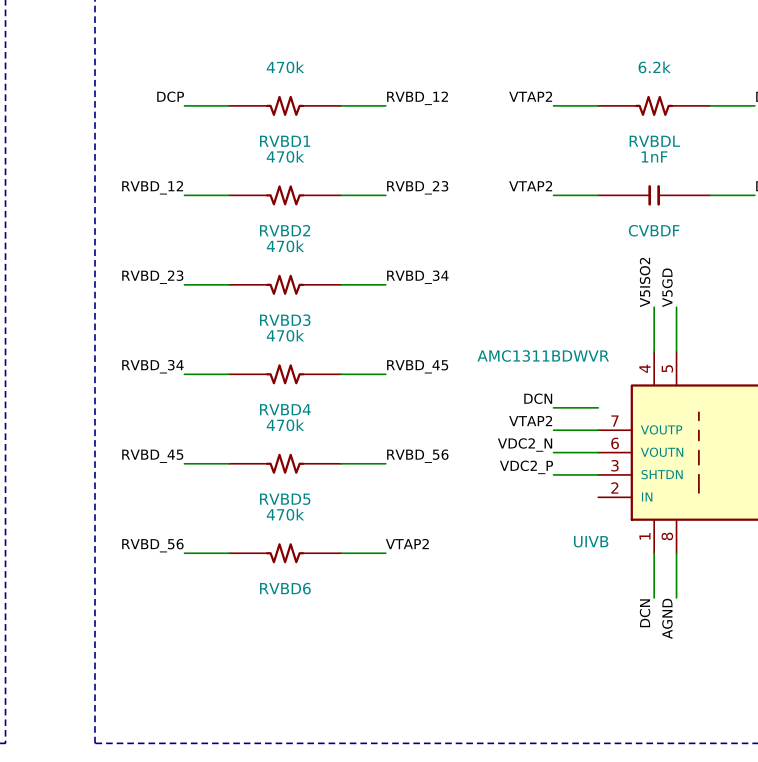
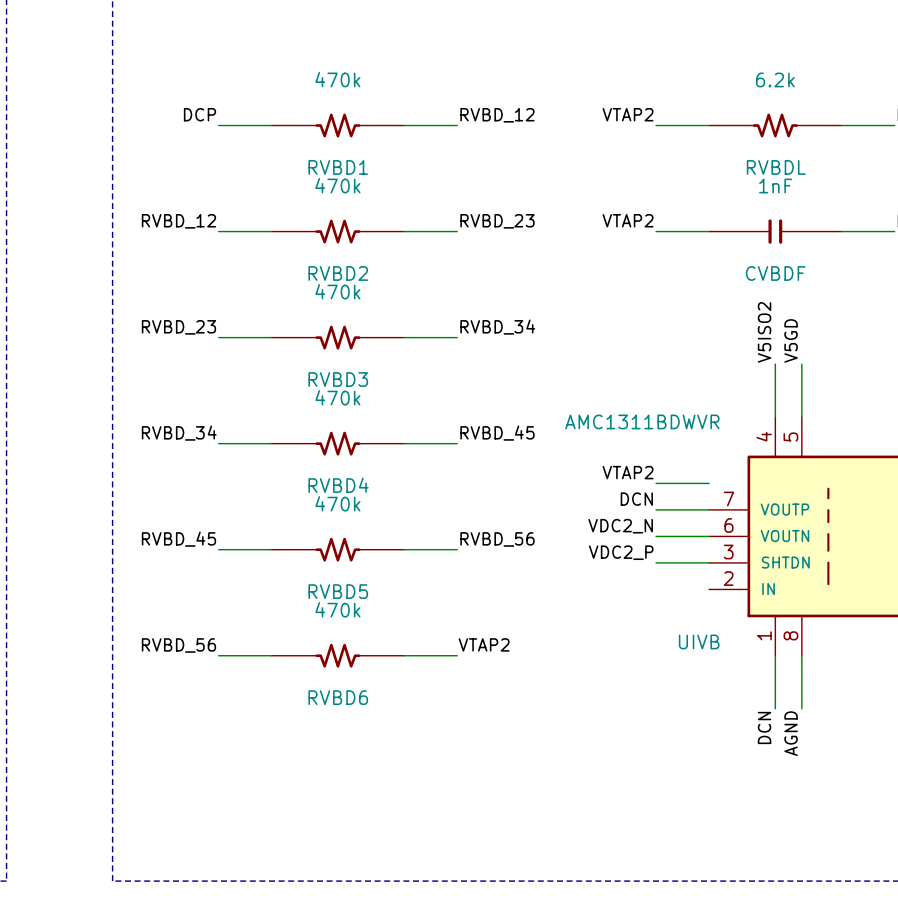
label: DCN (538, 398) -> VTAP2 (628, 472)
label: VTAP2 (530, 421) -> DCN (636, 499)

